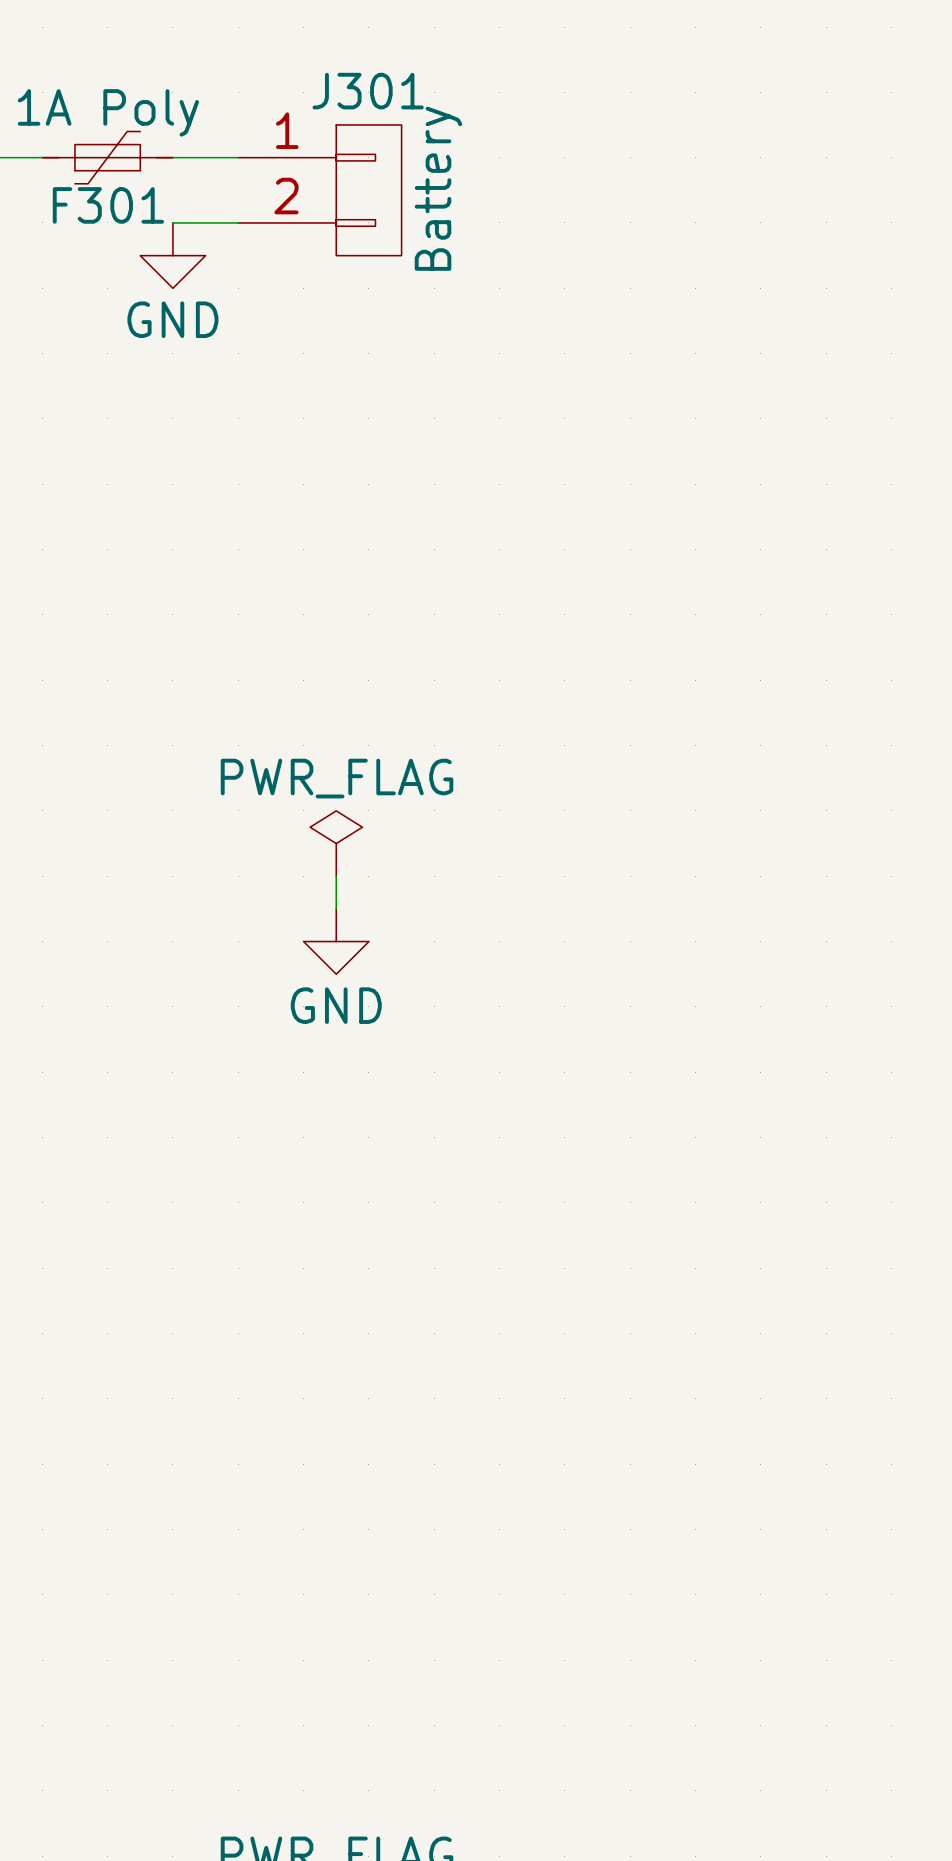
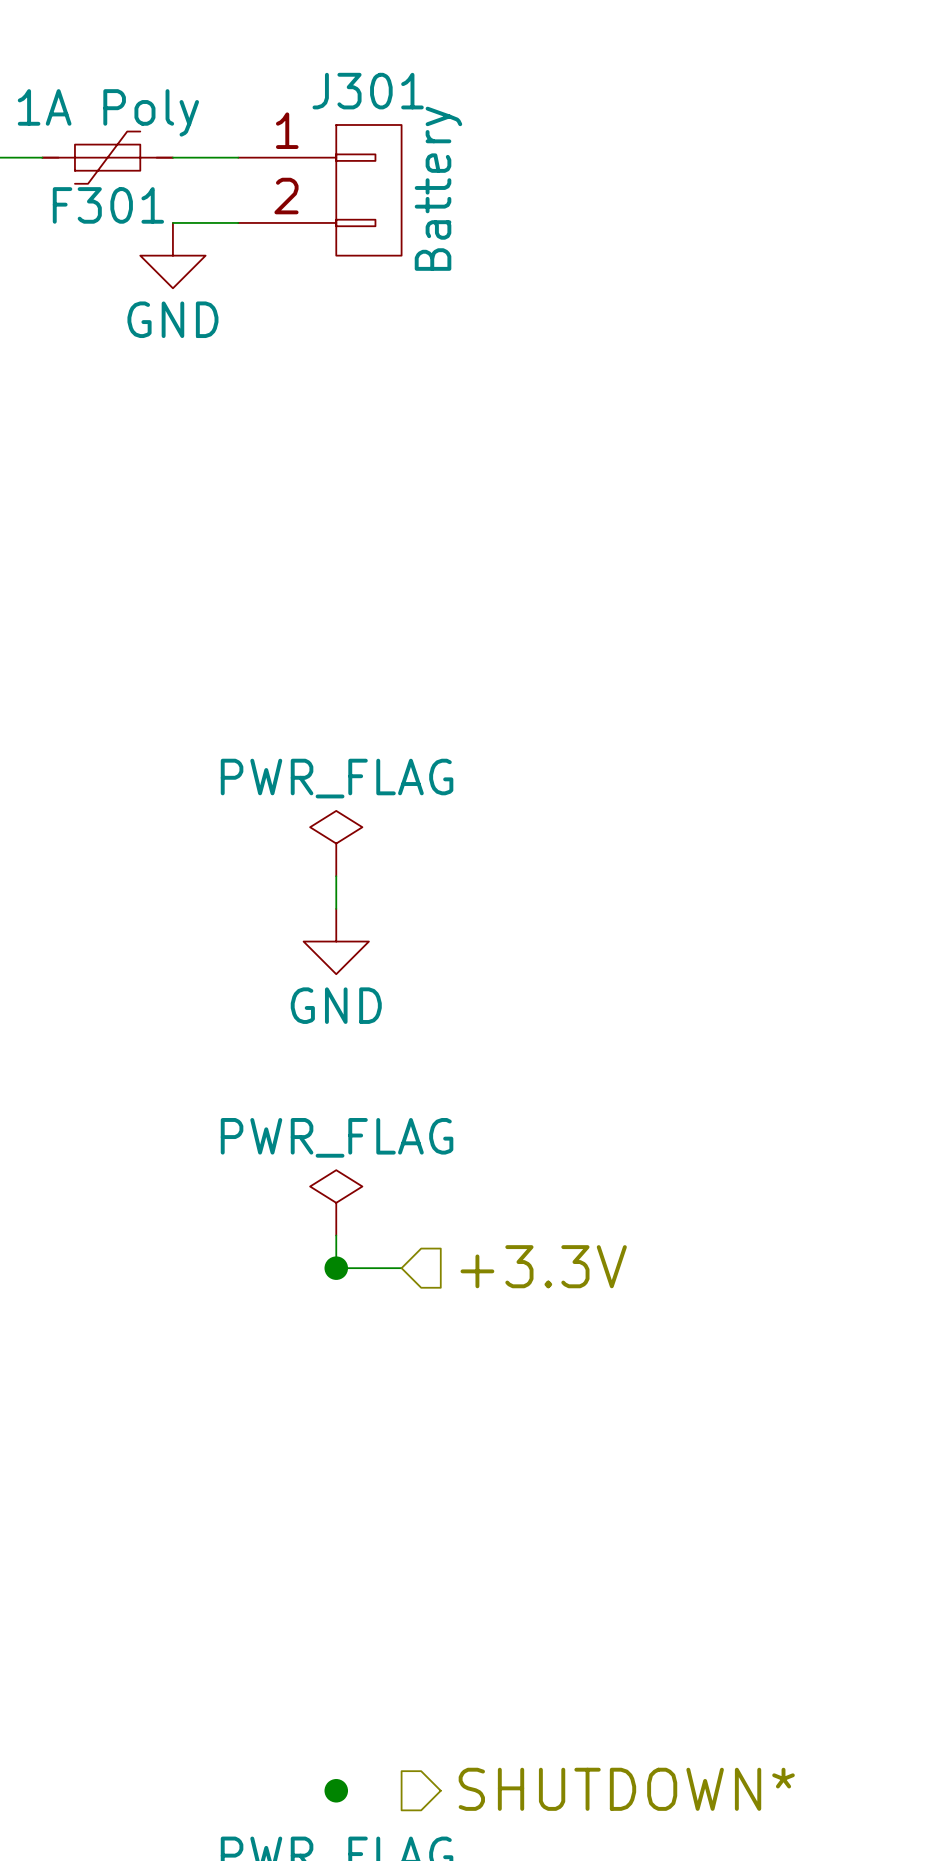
power symbol: none -> PWR_FLAG (336, 1202)
wire: none -> (336, 1235) (336, 1268) (401, 1268)
hierarchical label: none -> +3.3V (543, 1266)
junction: none -> (336, 1268)
hierarchical label: none -> SHUTDOWN* (626, 1789)
junction: none -> (336, 1790)

